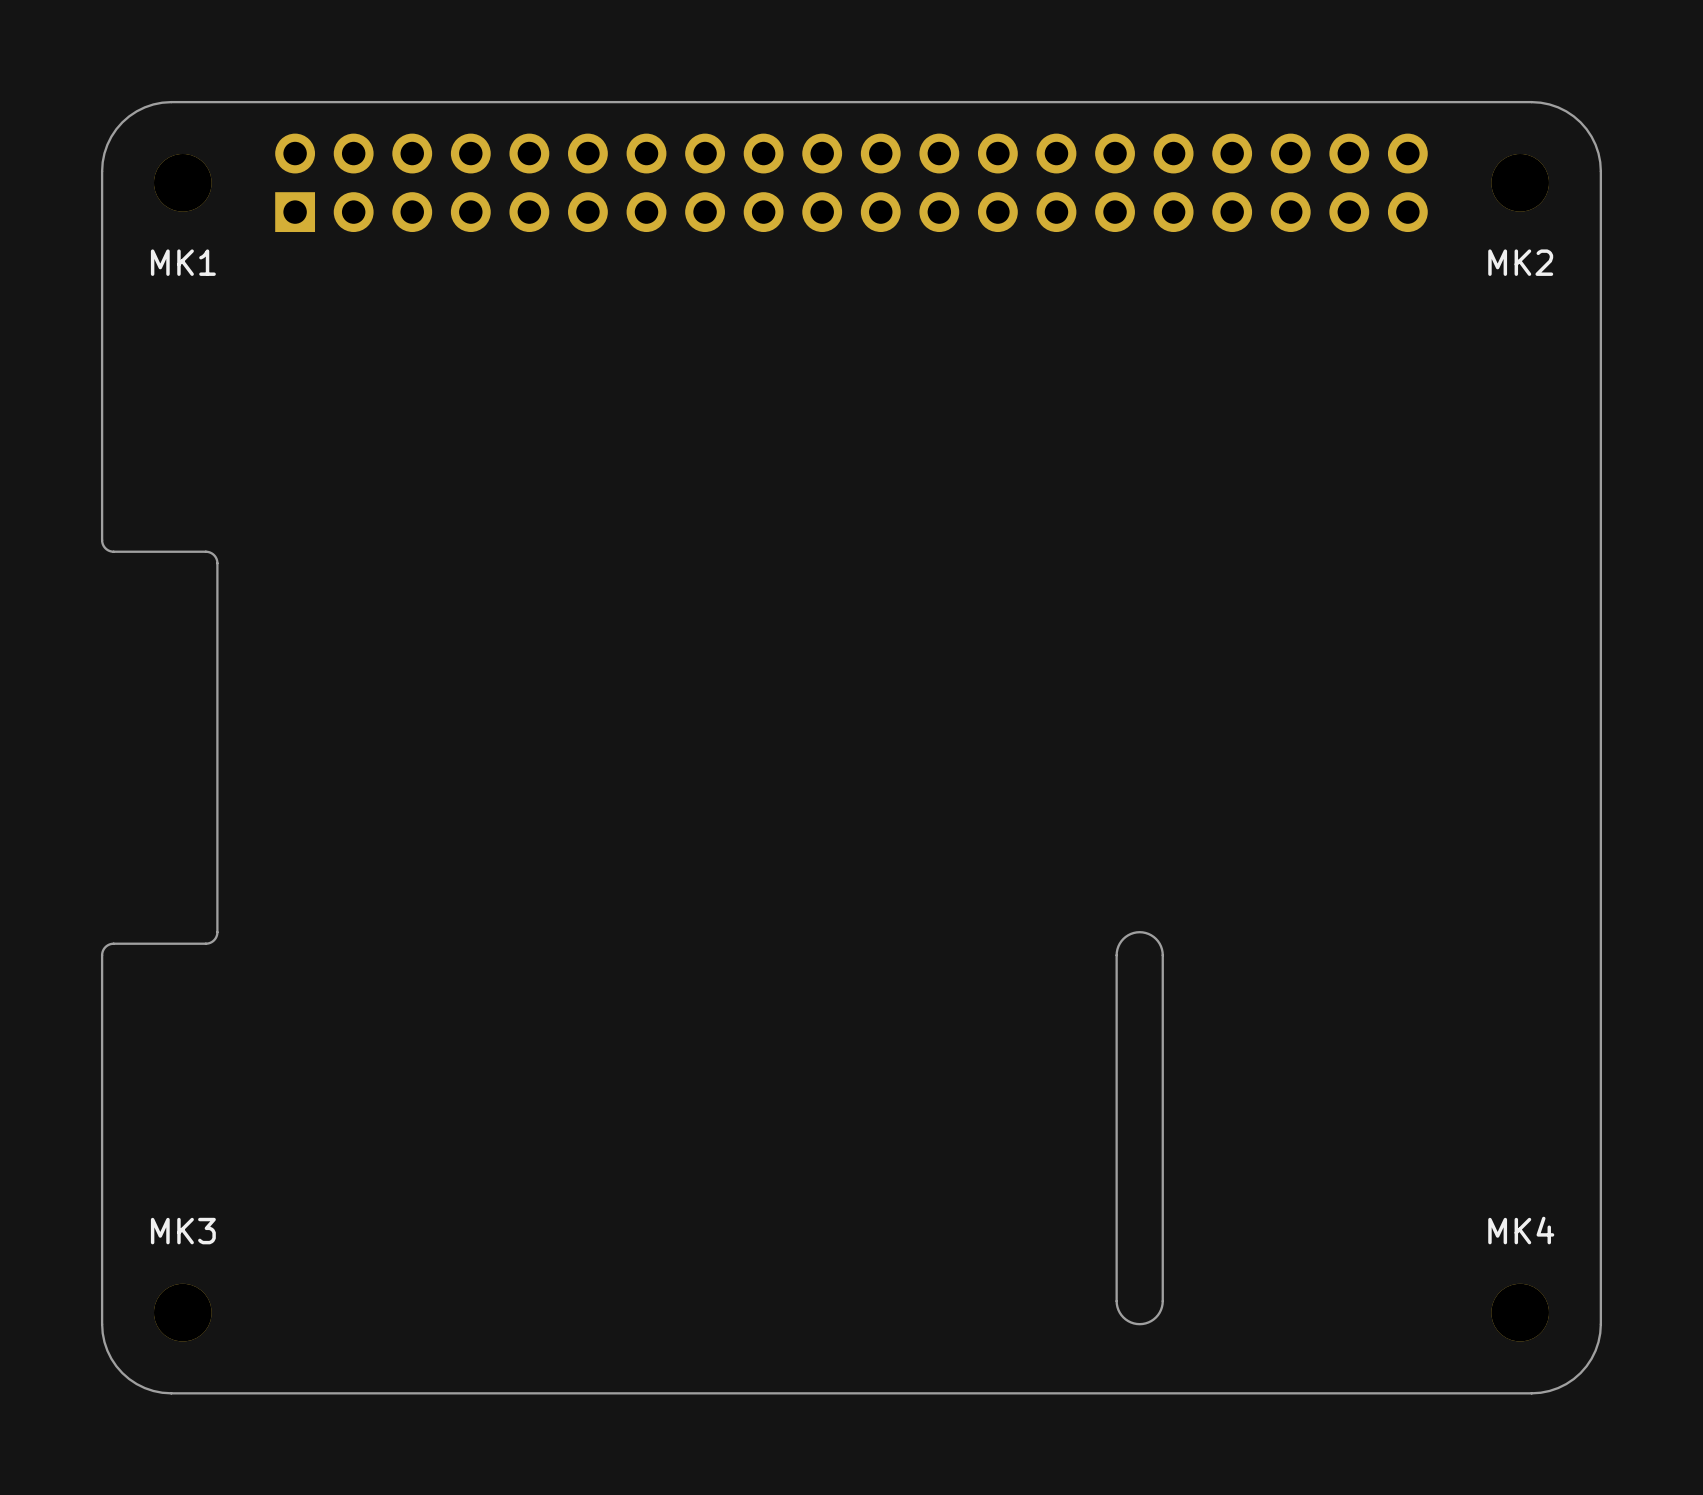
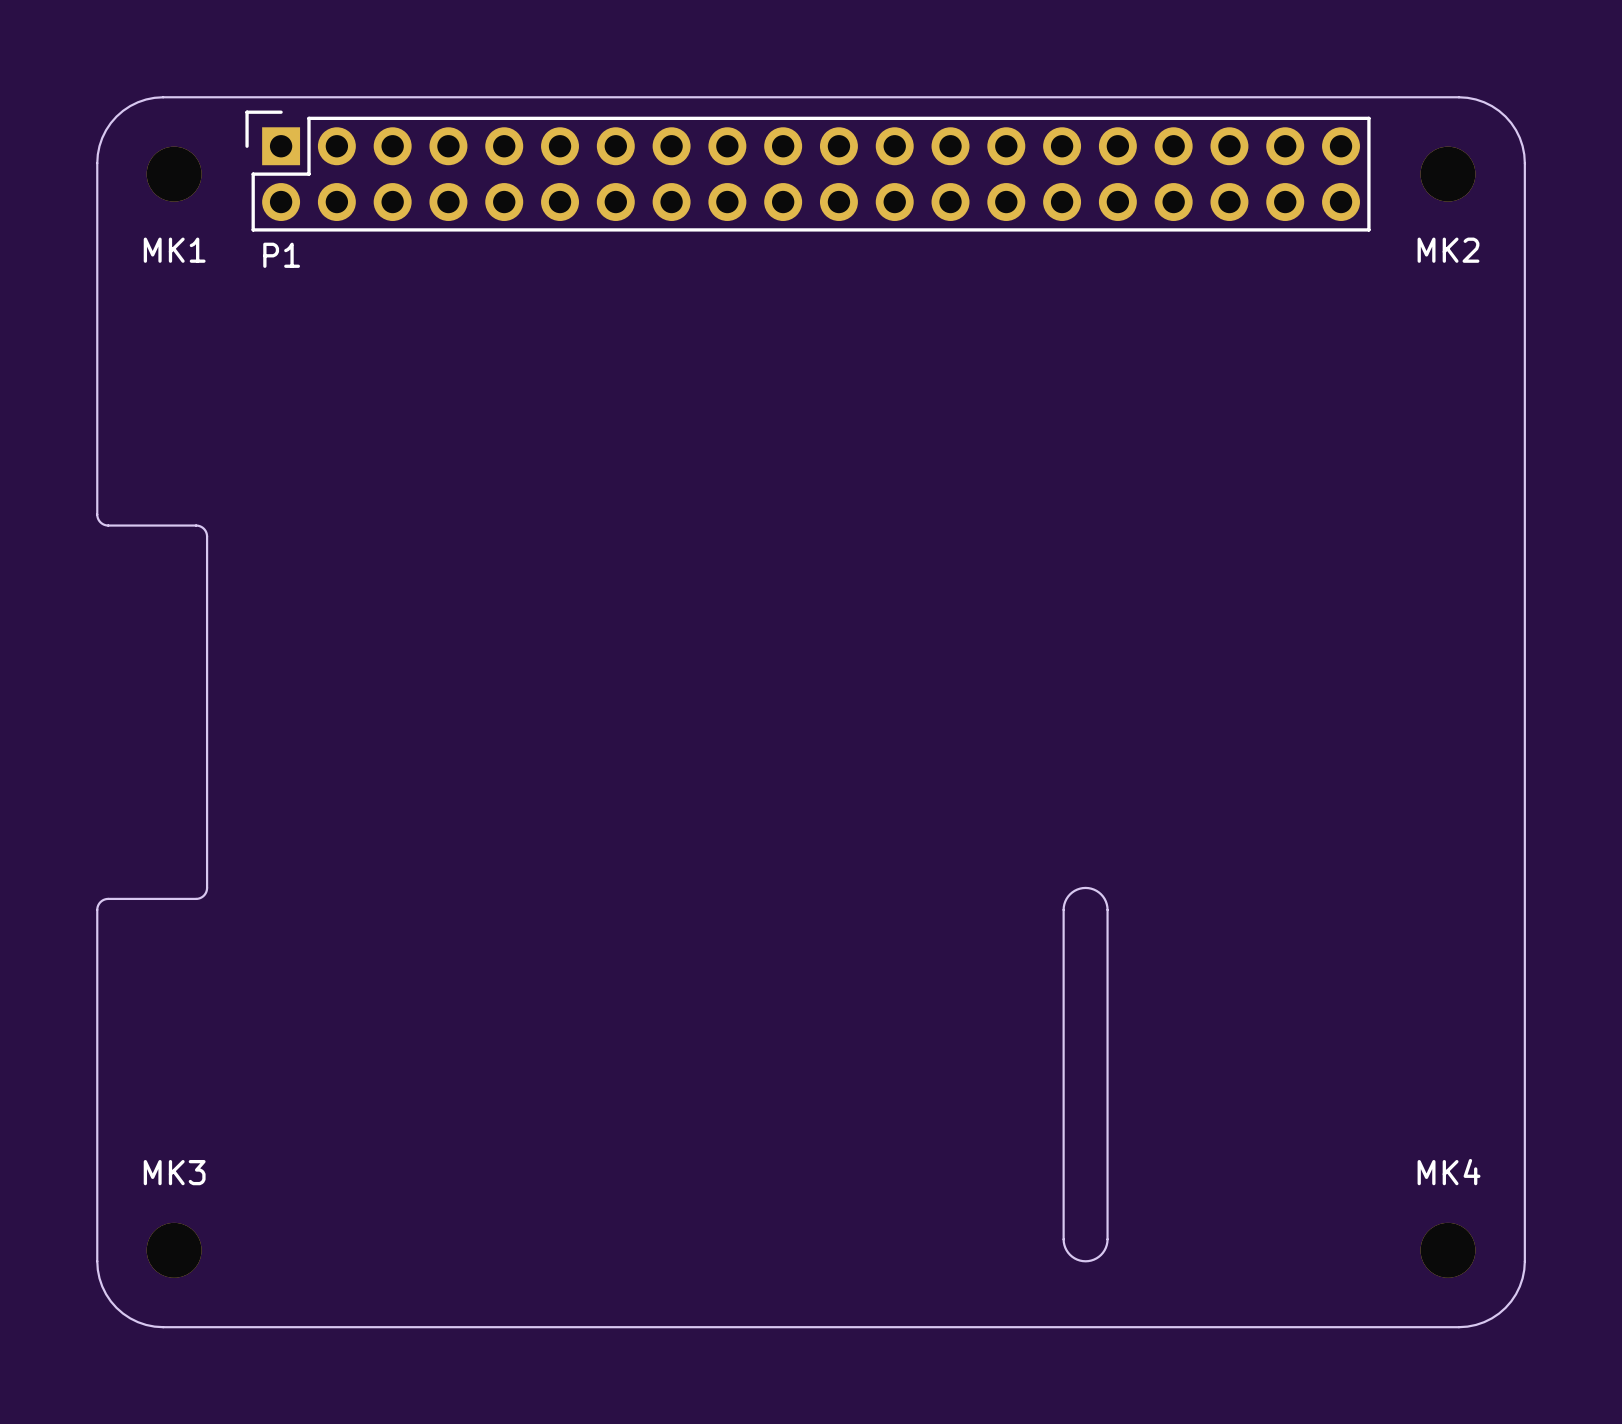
P1 side: bottom (851, 182) -> top (807, 171)

